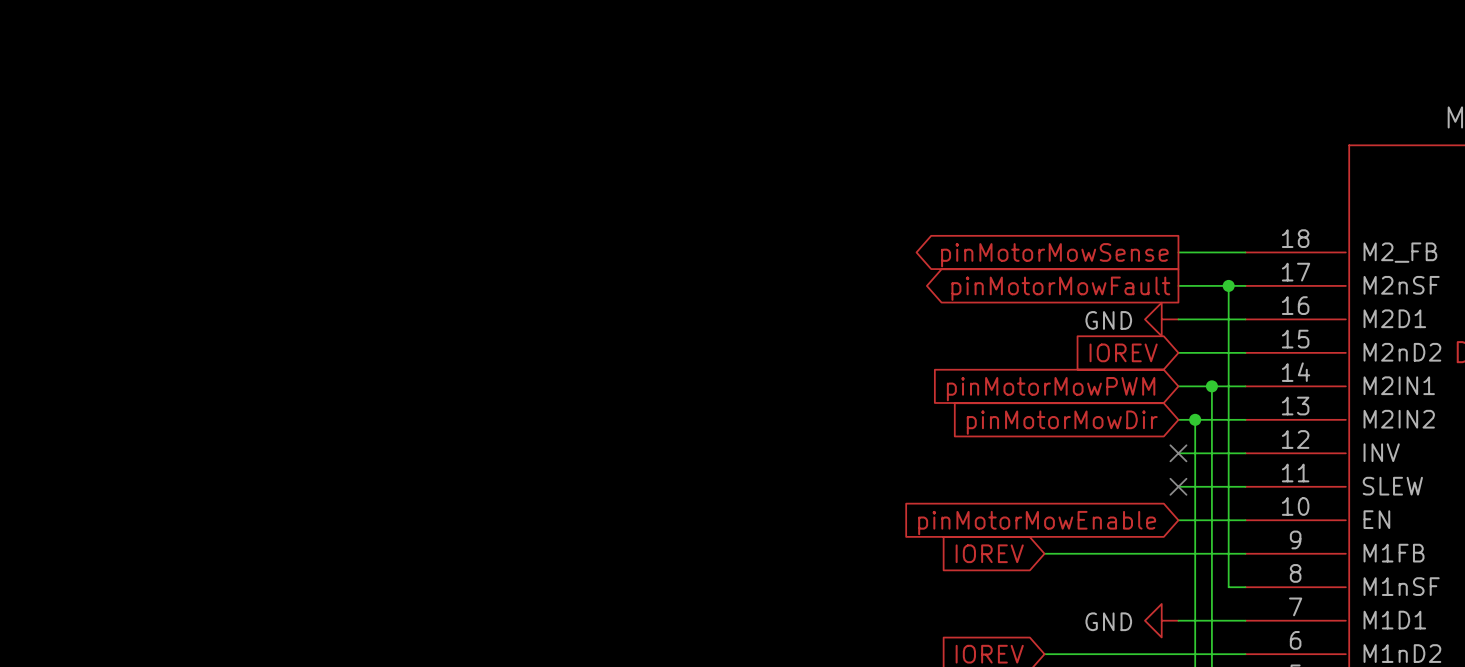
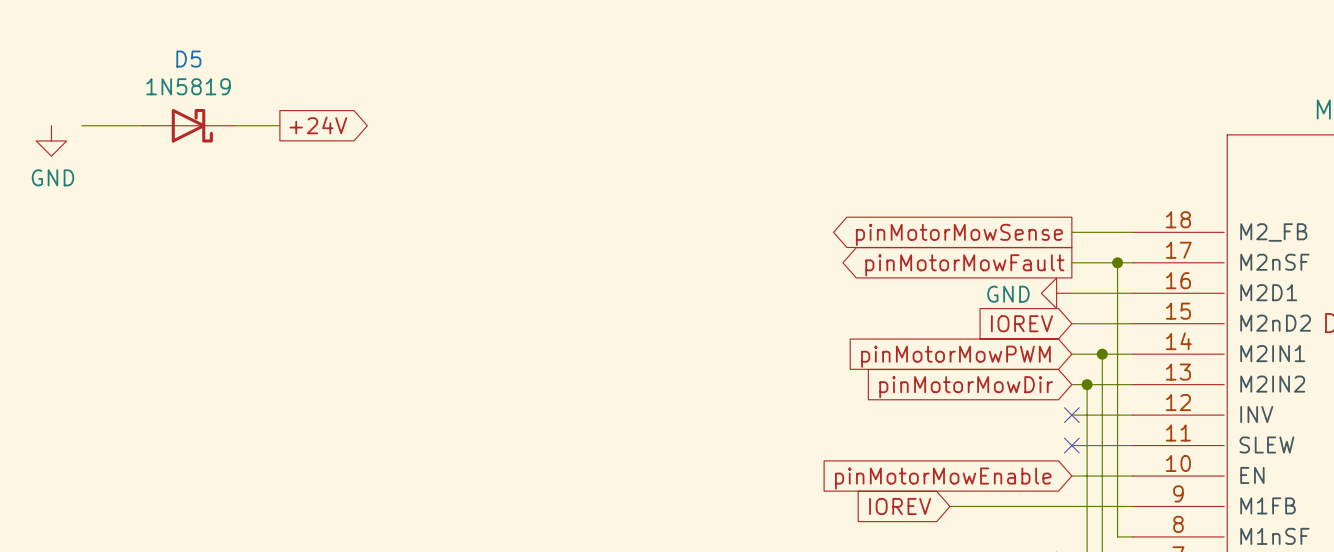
global label: none -> +24V (318, 125)
wire: none -> (81, 125) (142, 125)
D5: none -> 1N5819 (188, 125)
wire: none -> (234, 125) (279, 125)
power symbol: none -> GND (51, 140)

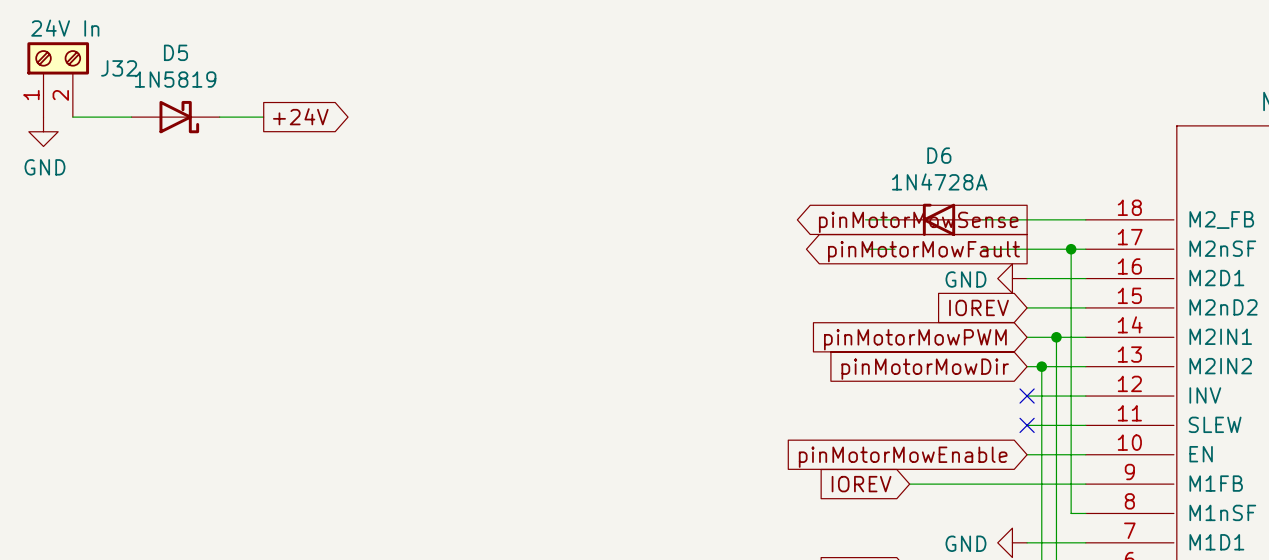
J32: none -> 24V In (58, 79)
wire: none -> (865, 219) (894, 219)
D6: none -> 1N4728A (939, 219)
wire: none -> (983, 219) (1027, 219)
wire: none -> (865, 249) (894, 249)
wire: none -> (983, 249) (1027, 249)

